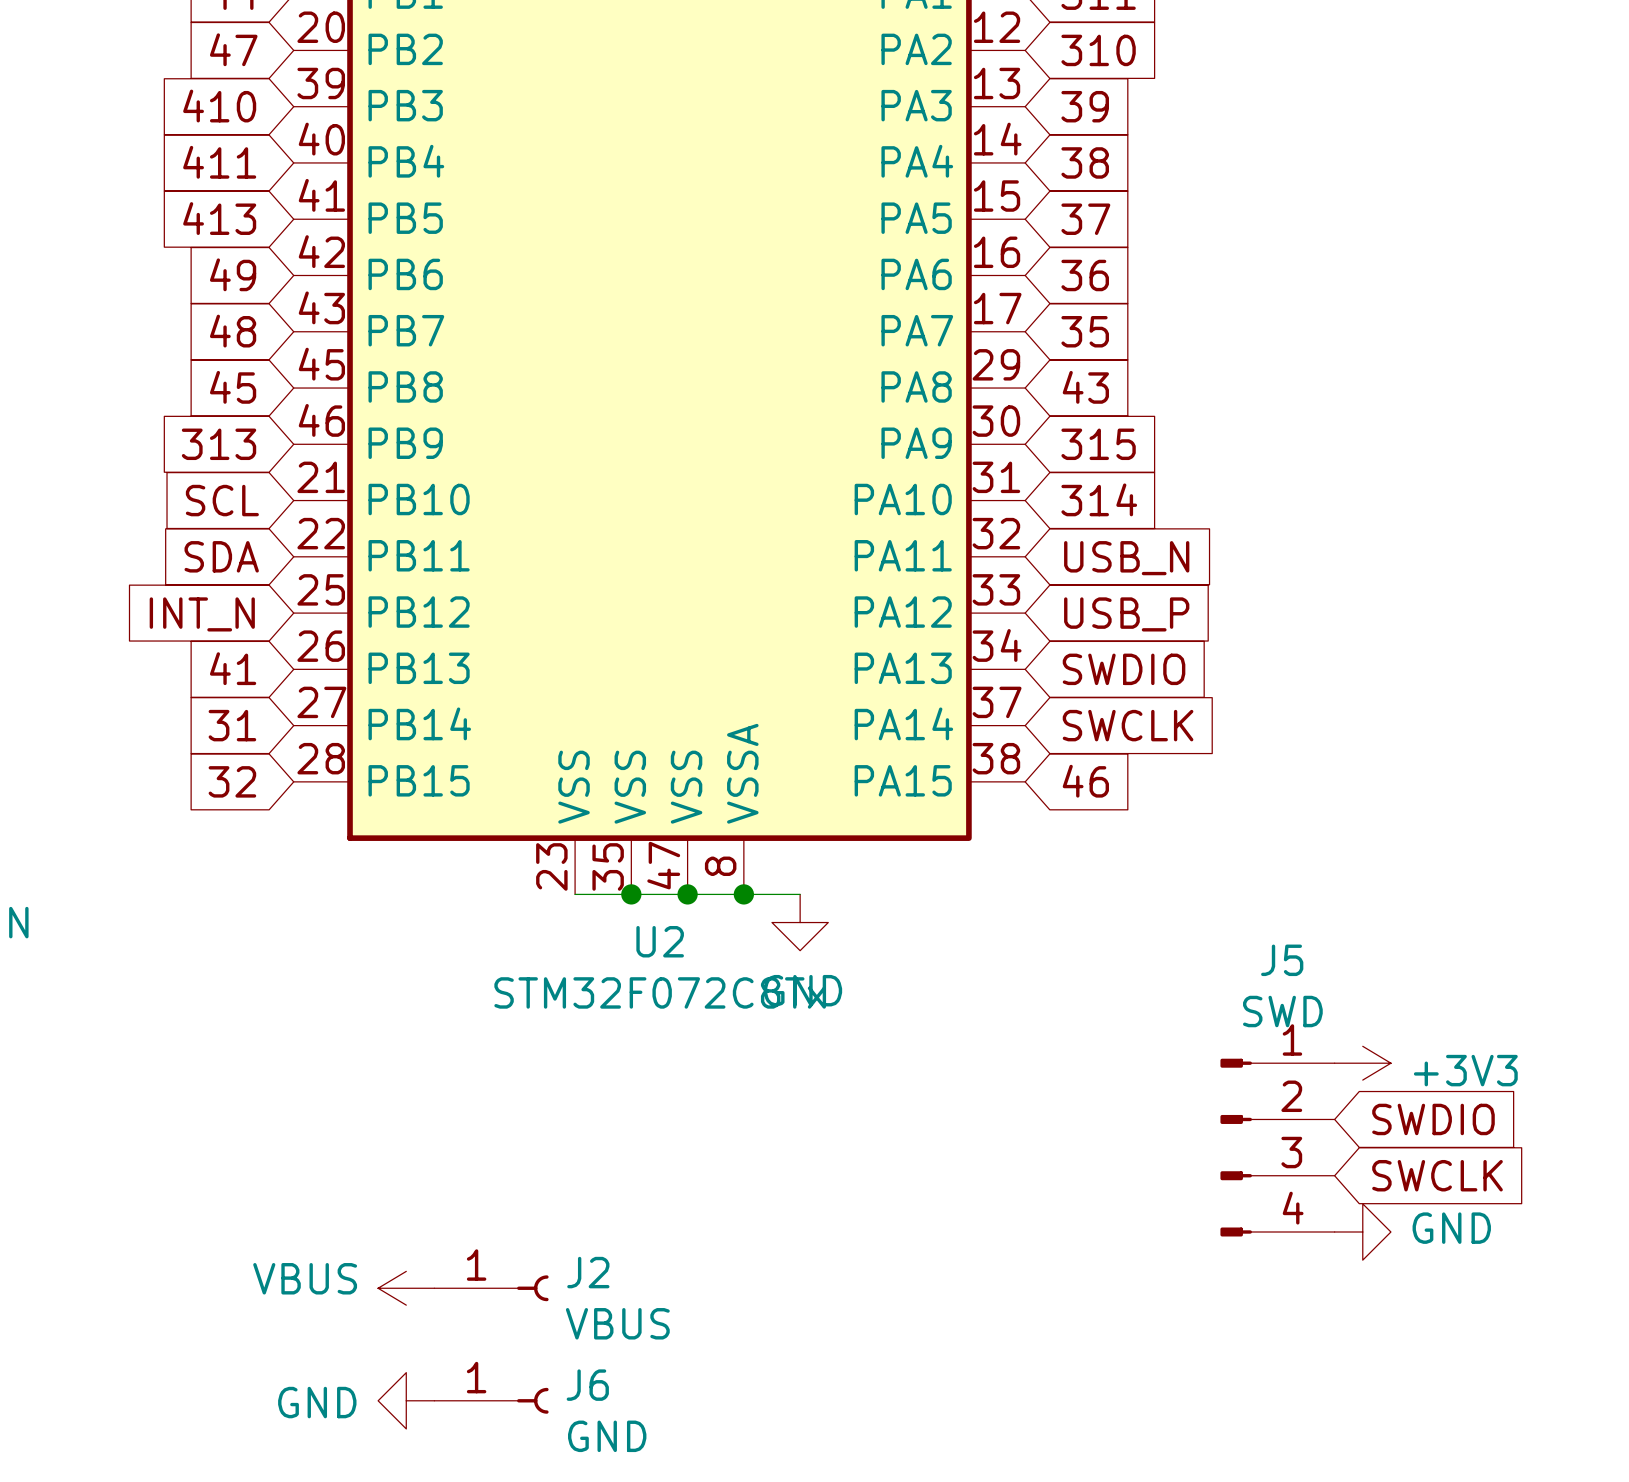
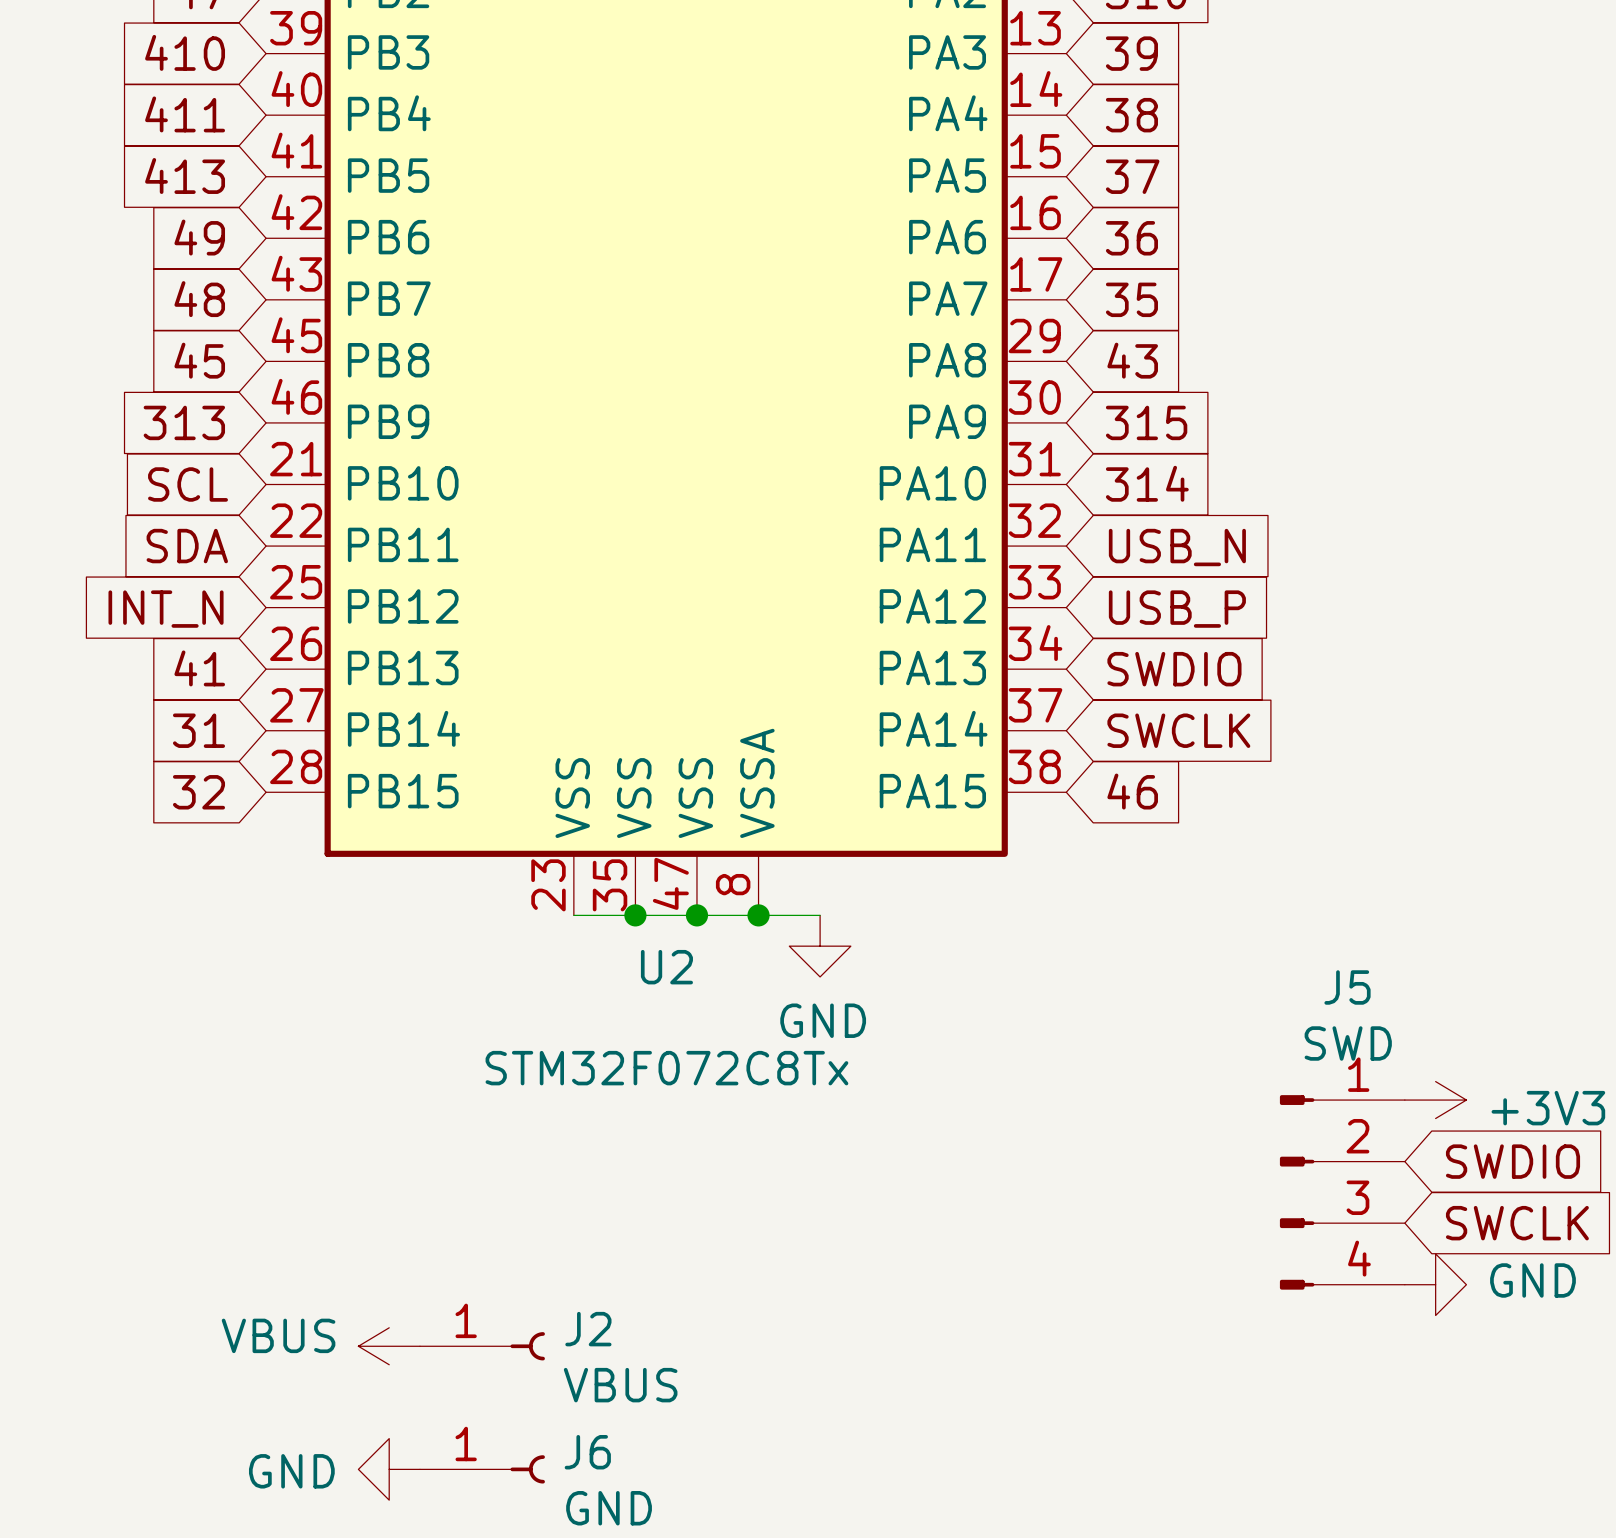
U2 value position: STM32F072C8Tx (660, 992) -> STM32F072C8Tx (666, 1068)

